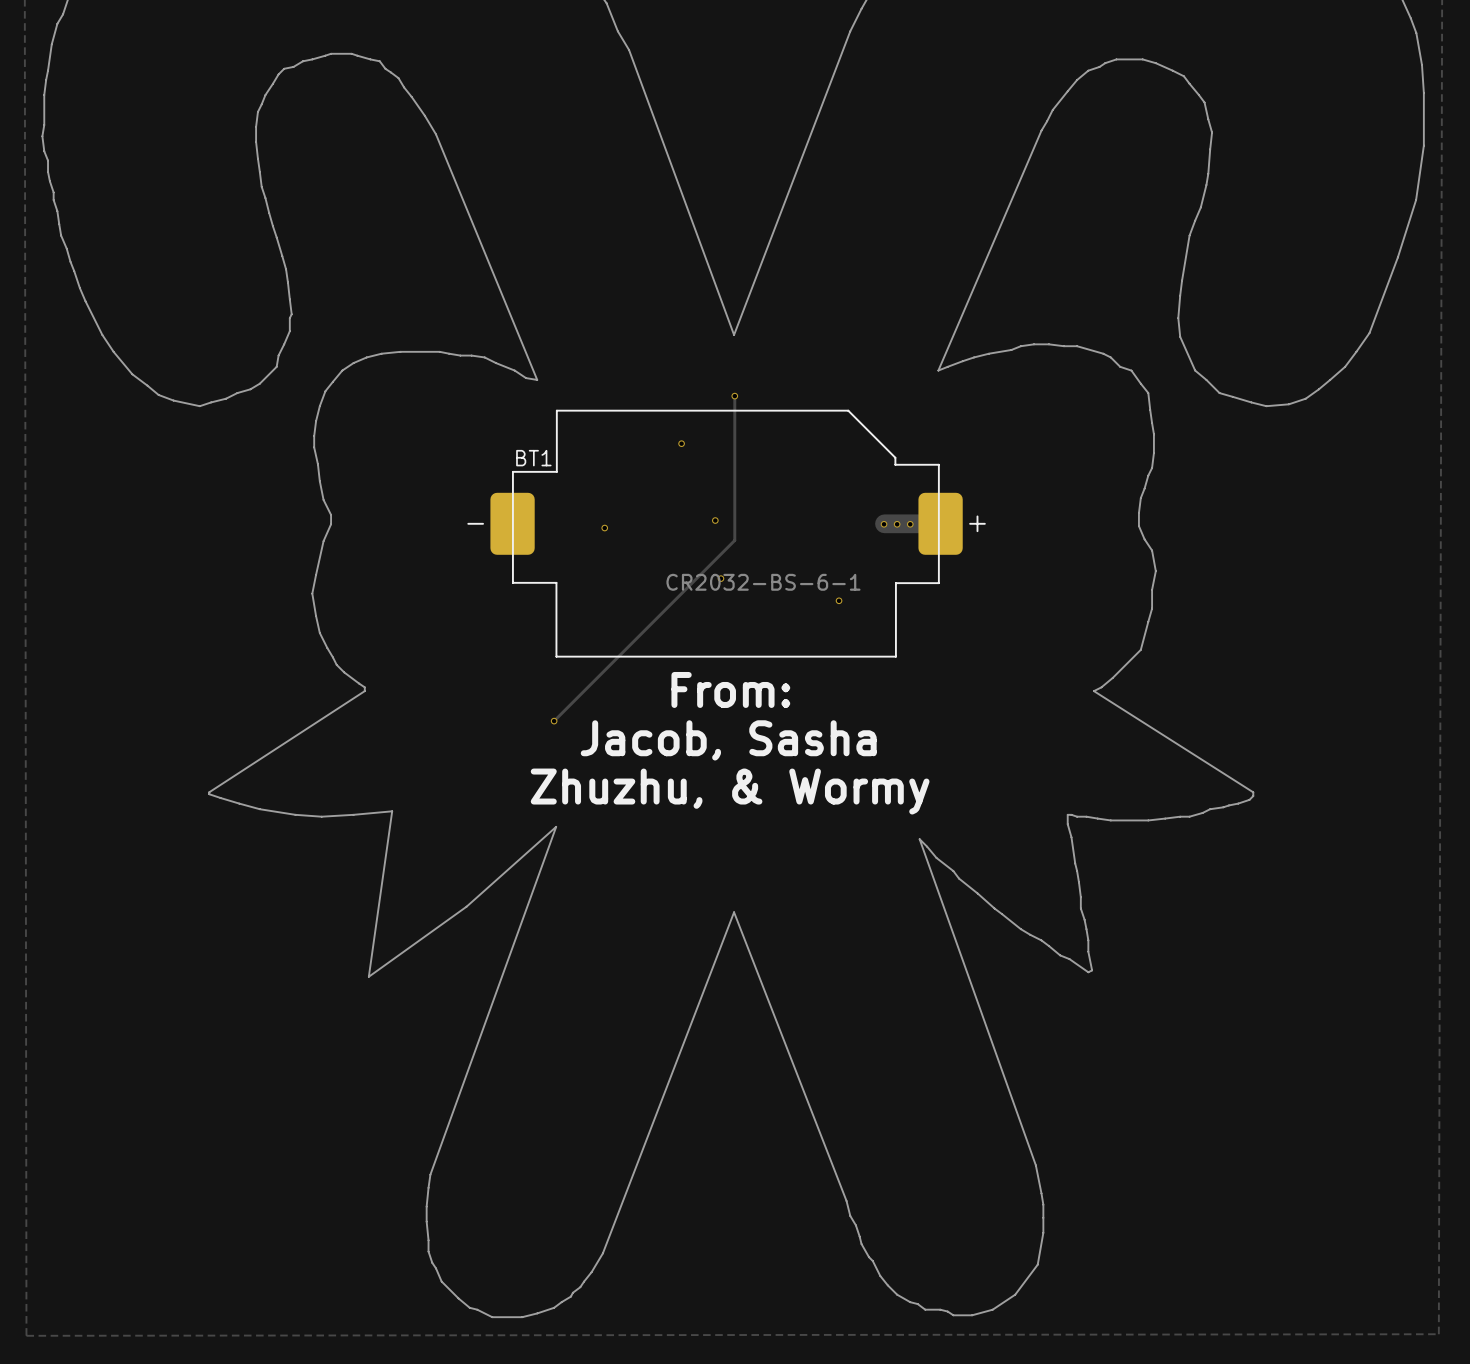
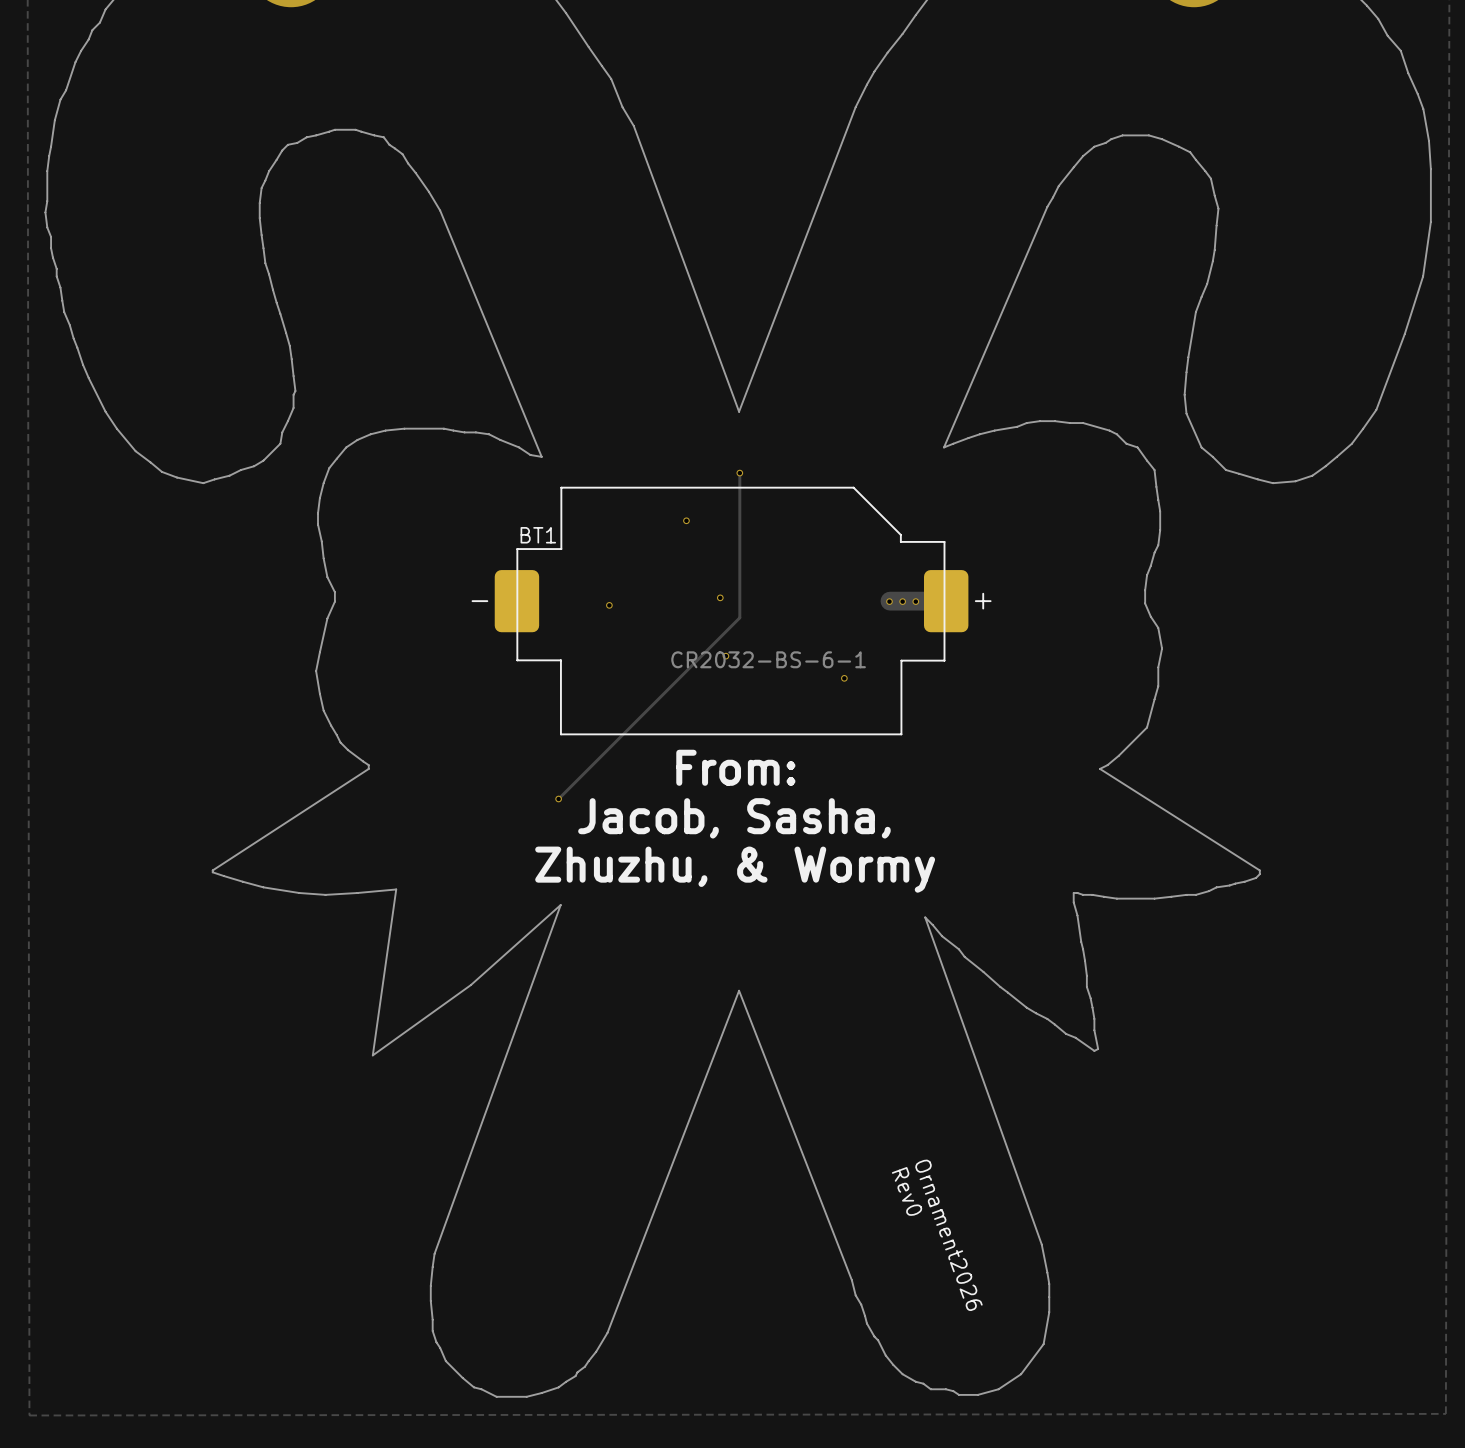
text: Jacob, Sasha (728, 740) -> Jacob, Sasha, (734, 818)
text: none -> Rev0 (907, 1191)
text: none -> Ornament2026 (948, 1235)

